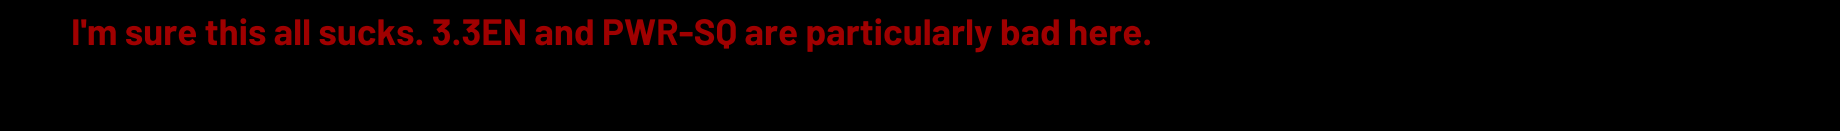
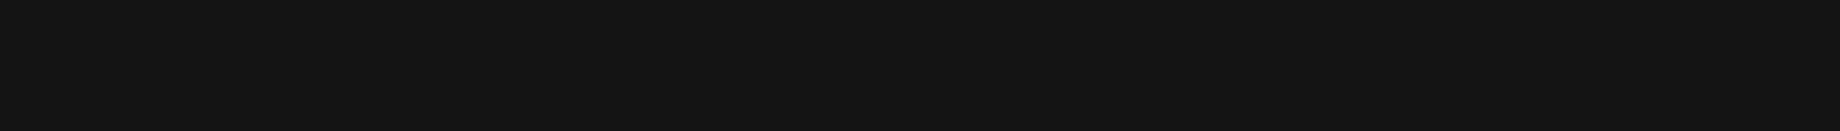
text: I'm sure this all sucks. 3.3EN and PWR-SQ are particularly bad here. (611, 35) -> none

